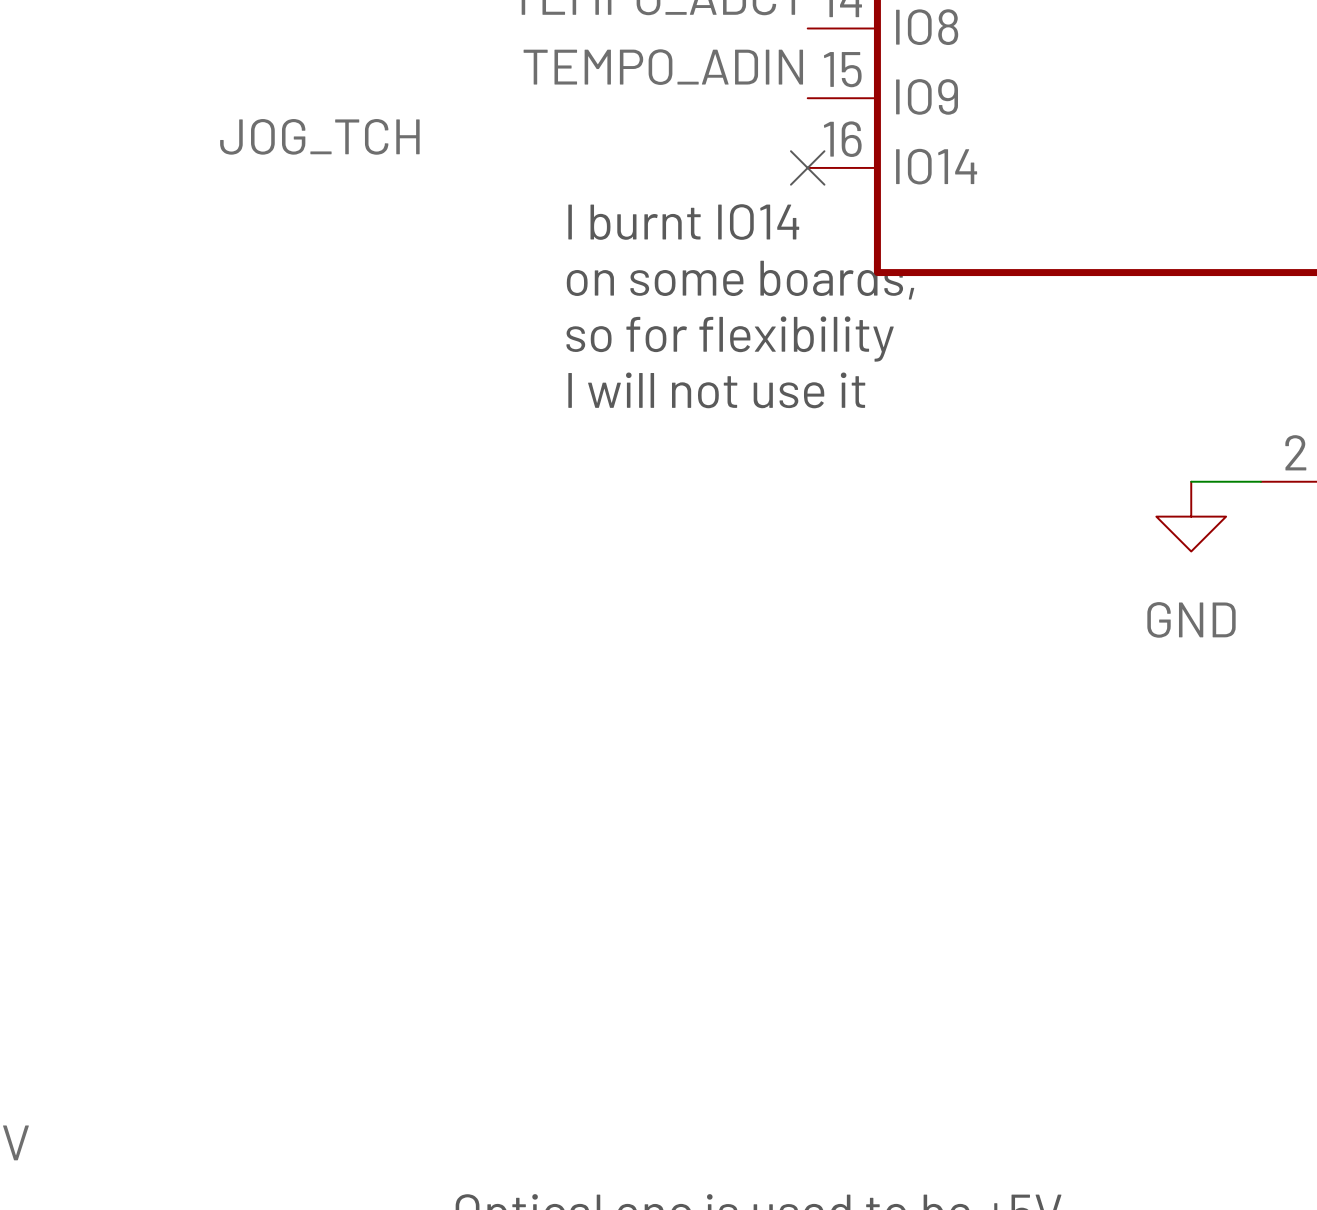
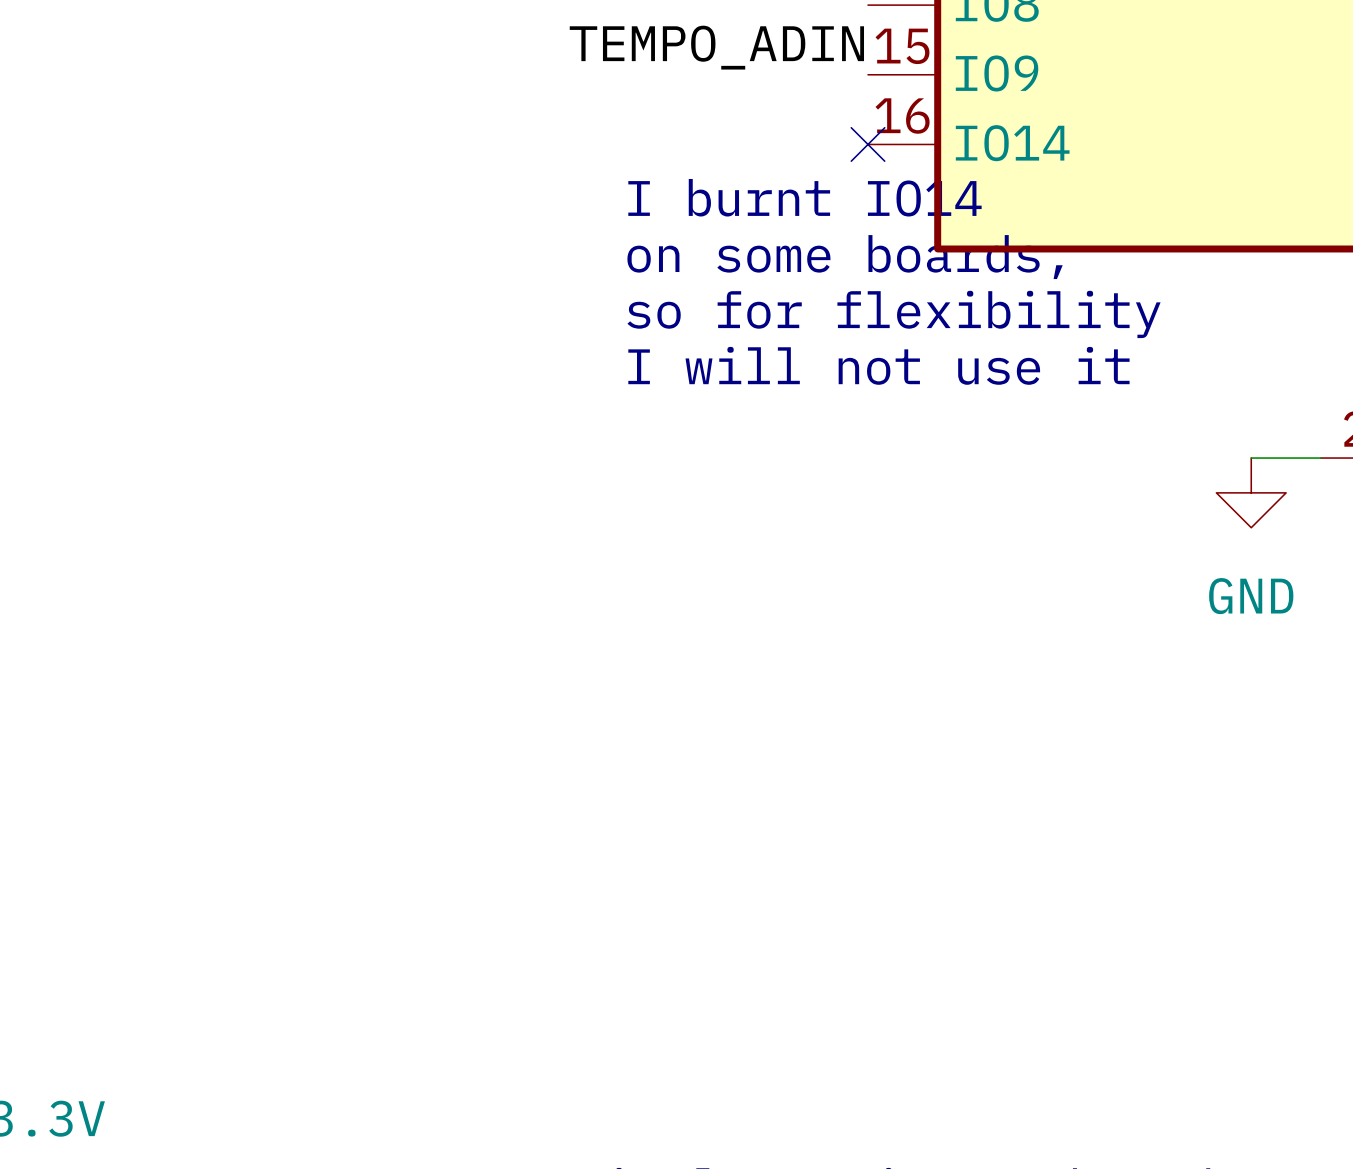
label: JOG_TCH (319, 136) -> none

